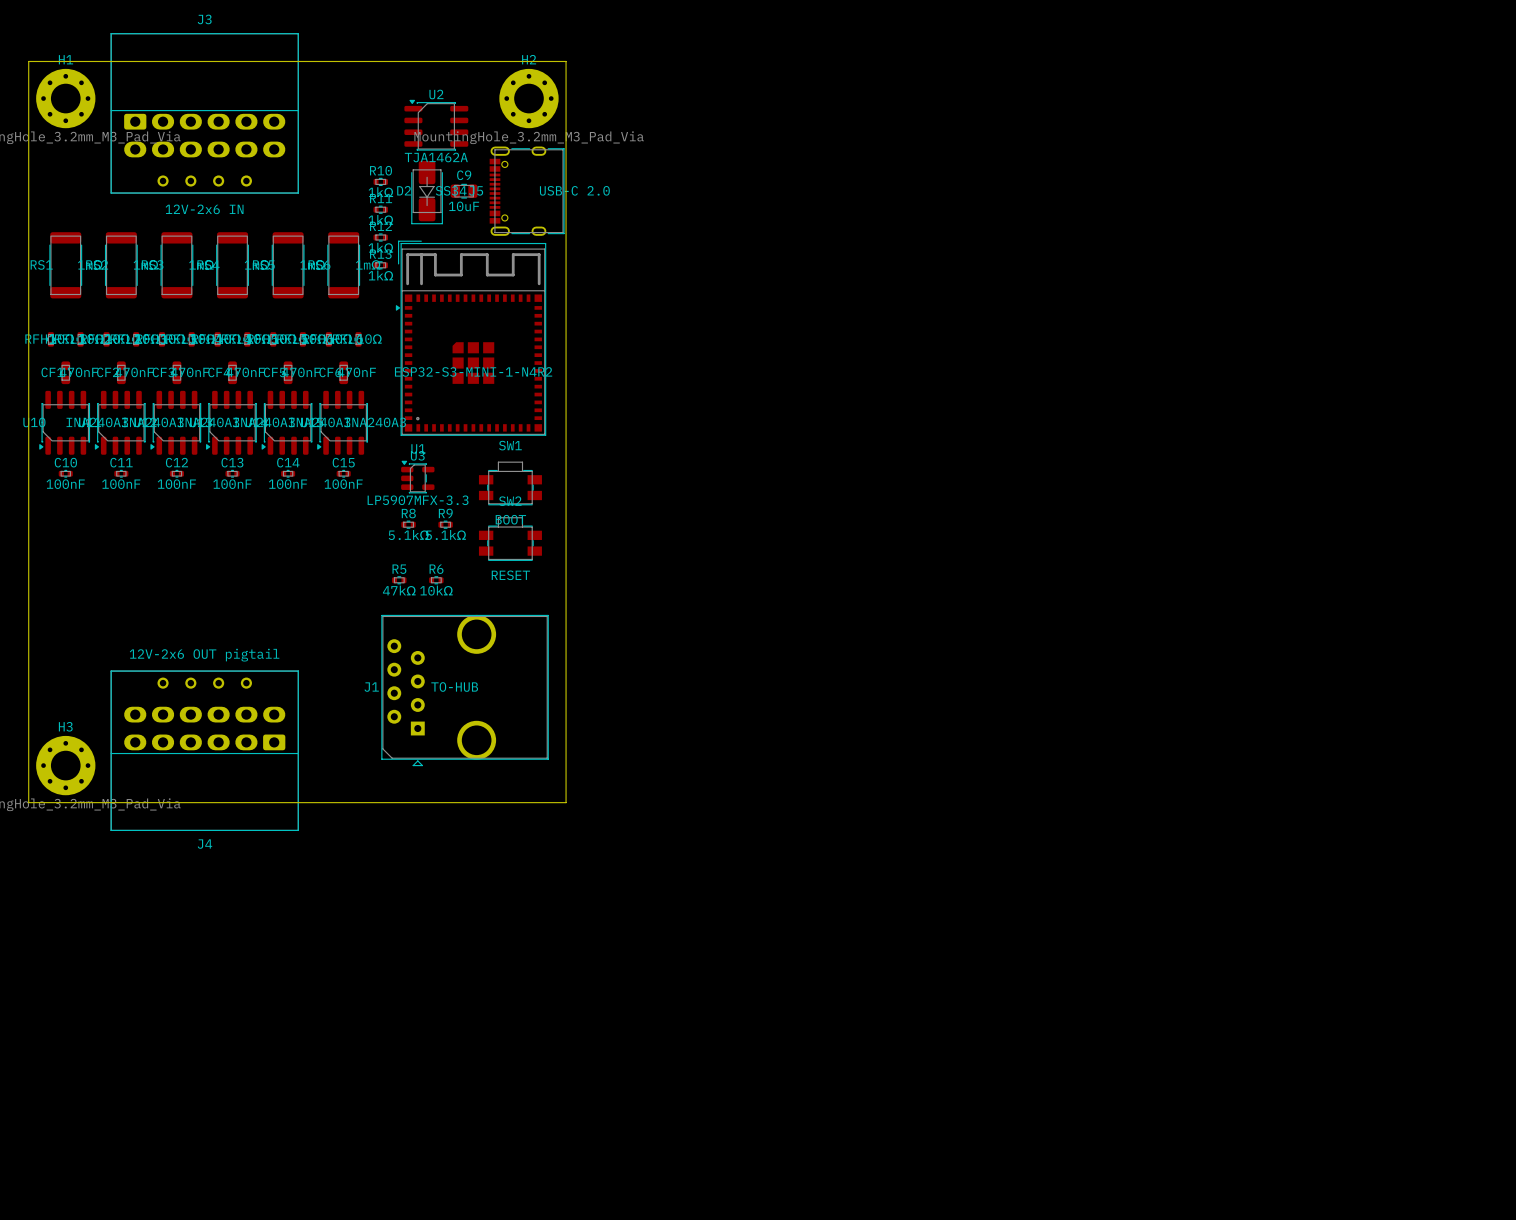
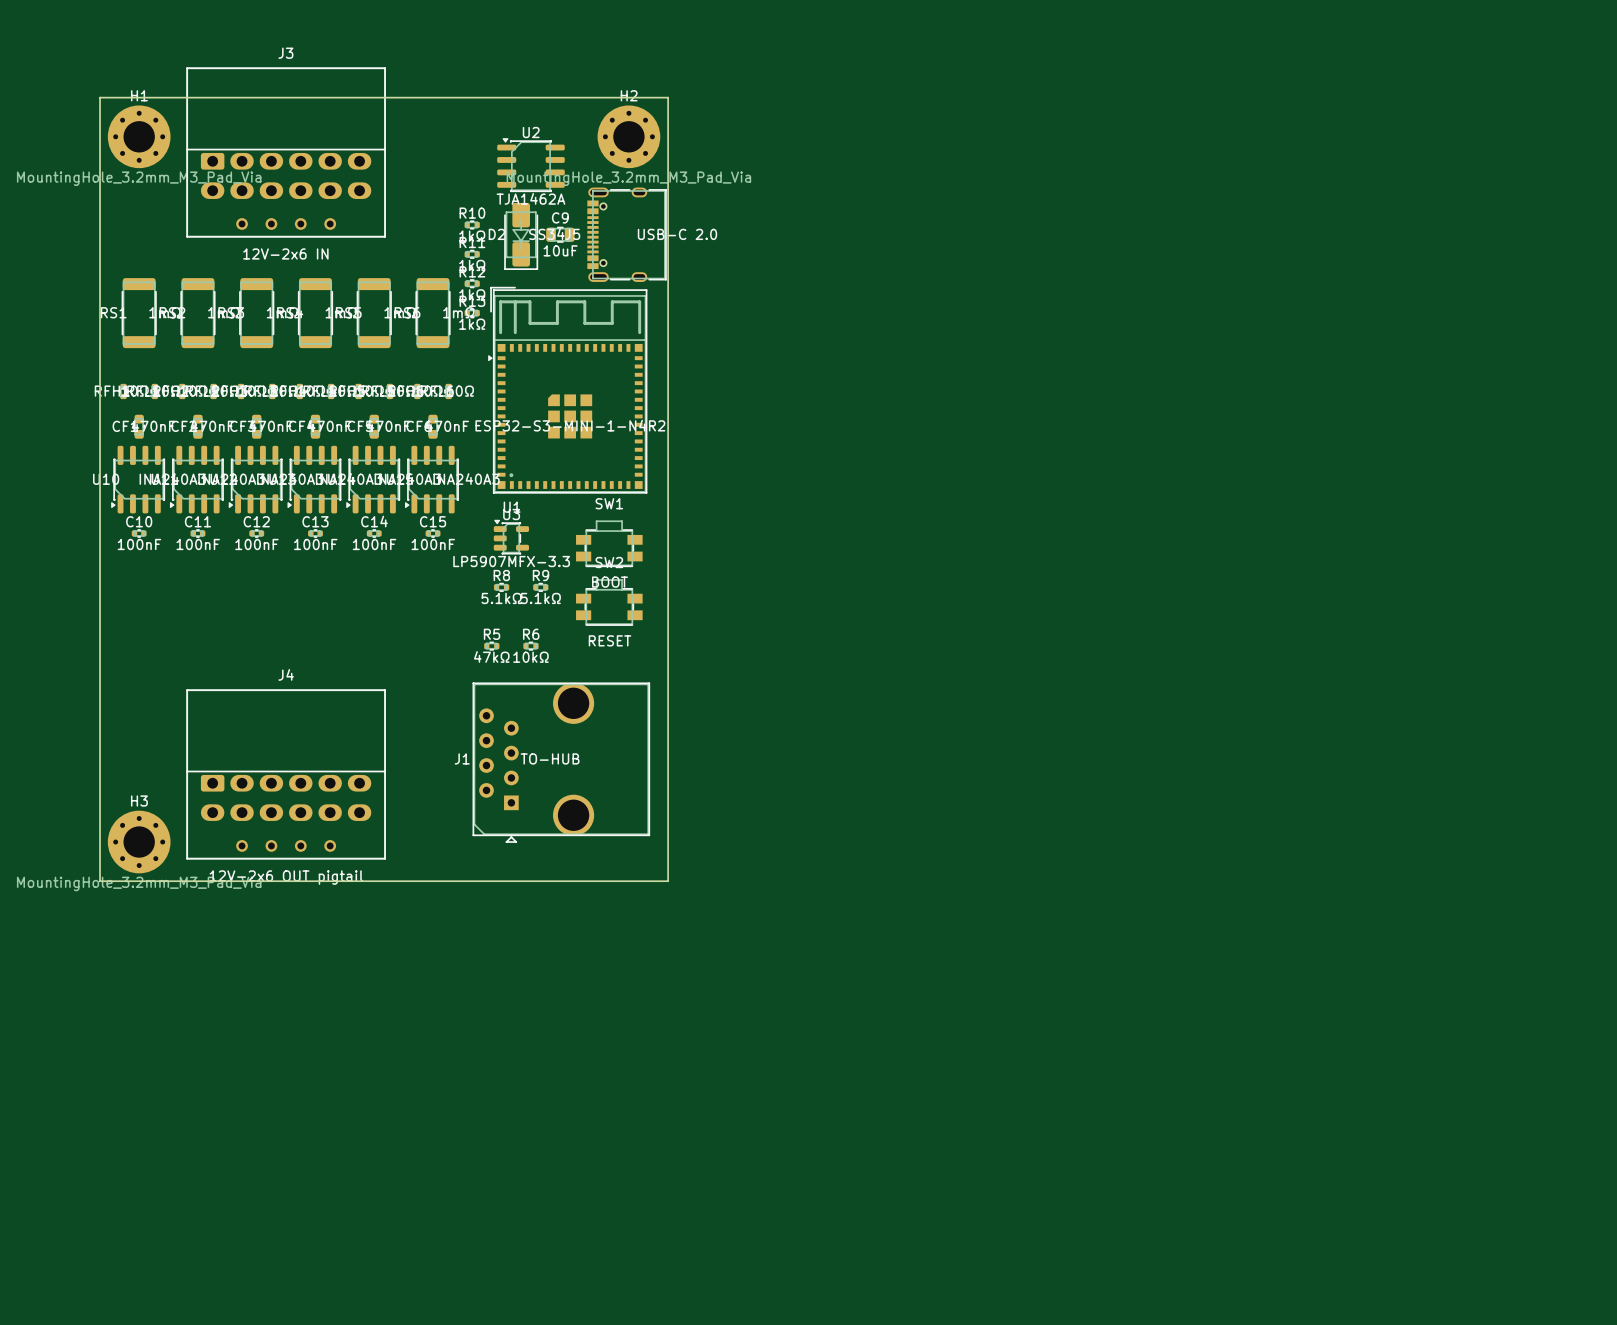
J4 rotation: 0° (204, 750) -> 180° (286, 774)

